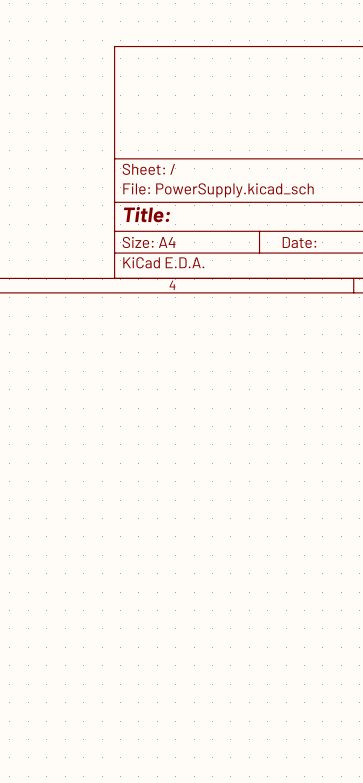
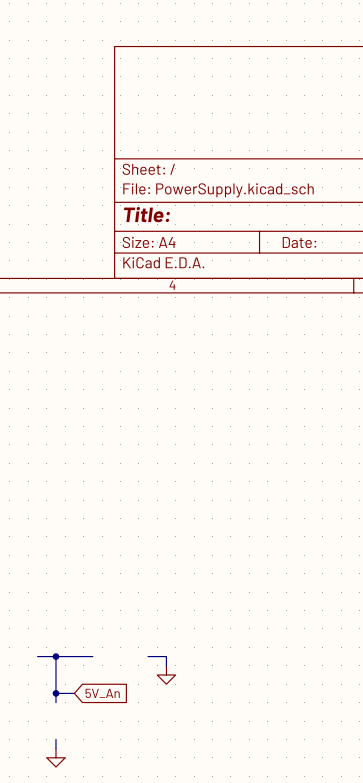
wire: none -> (37, 656) (92, 656)
wire: none -> (55, 656) (55, 702)
junction: none -> (55, 656)
wire: none -> (148, 656) (166, 656) (166, 665)
power symbol: none -> (166, 674)
wire: none -> (55, 693) (74, 693)
junction: none -> (55, 693)
global label: none -> 5V_An (102, 693)
wire: none -> (55, 739) (55, 748)
power symbol: none -> (55, 757)

